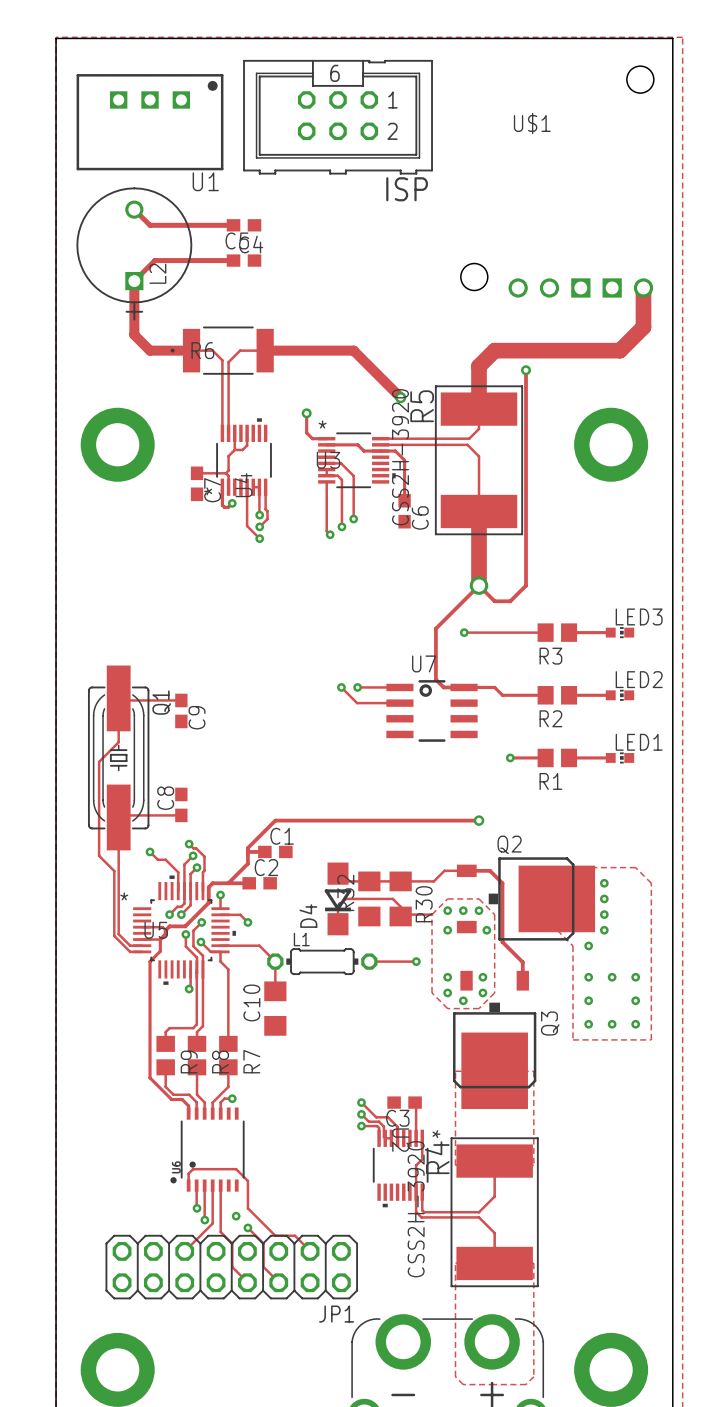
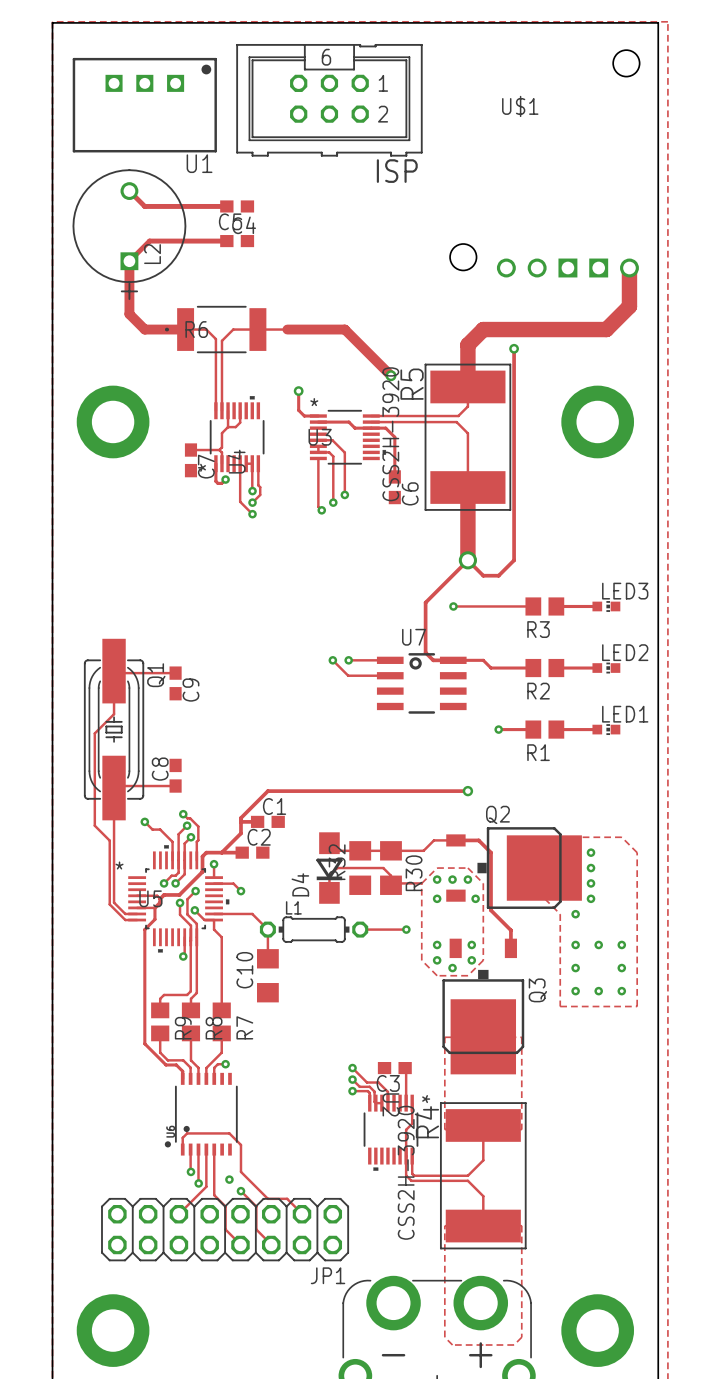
track width: thick (265, 350) (295, 350) -> thin (257, 329) (287, 329)

